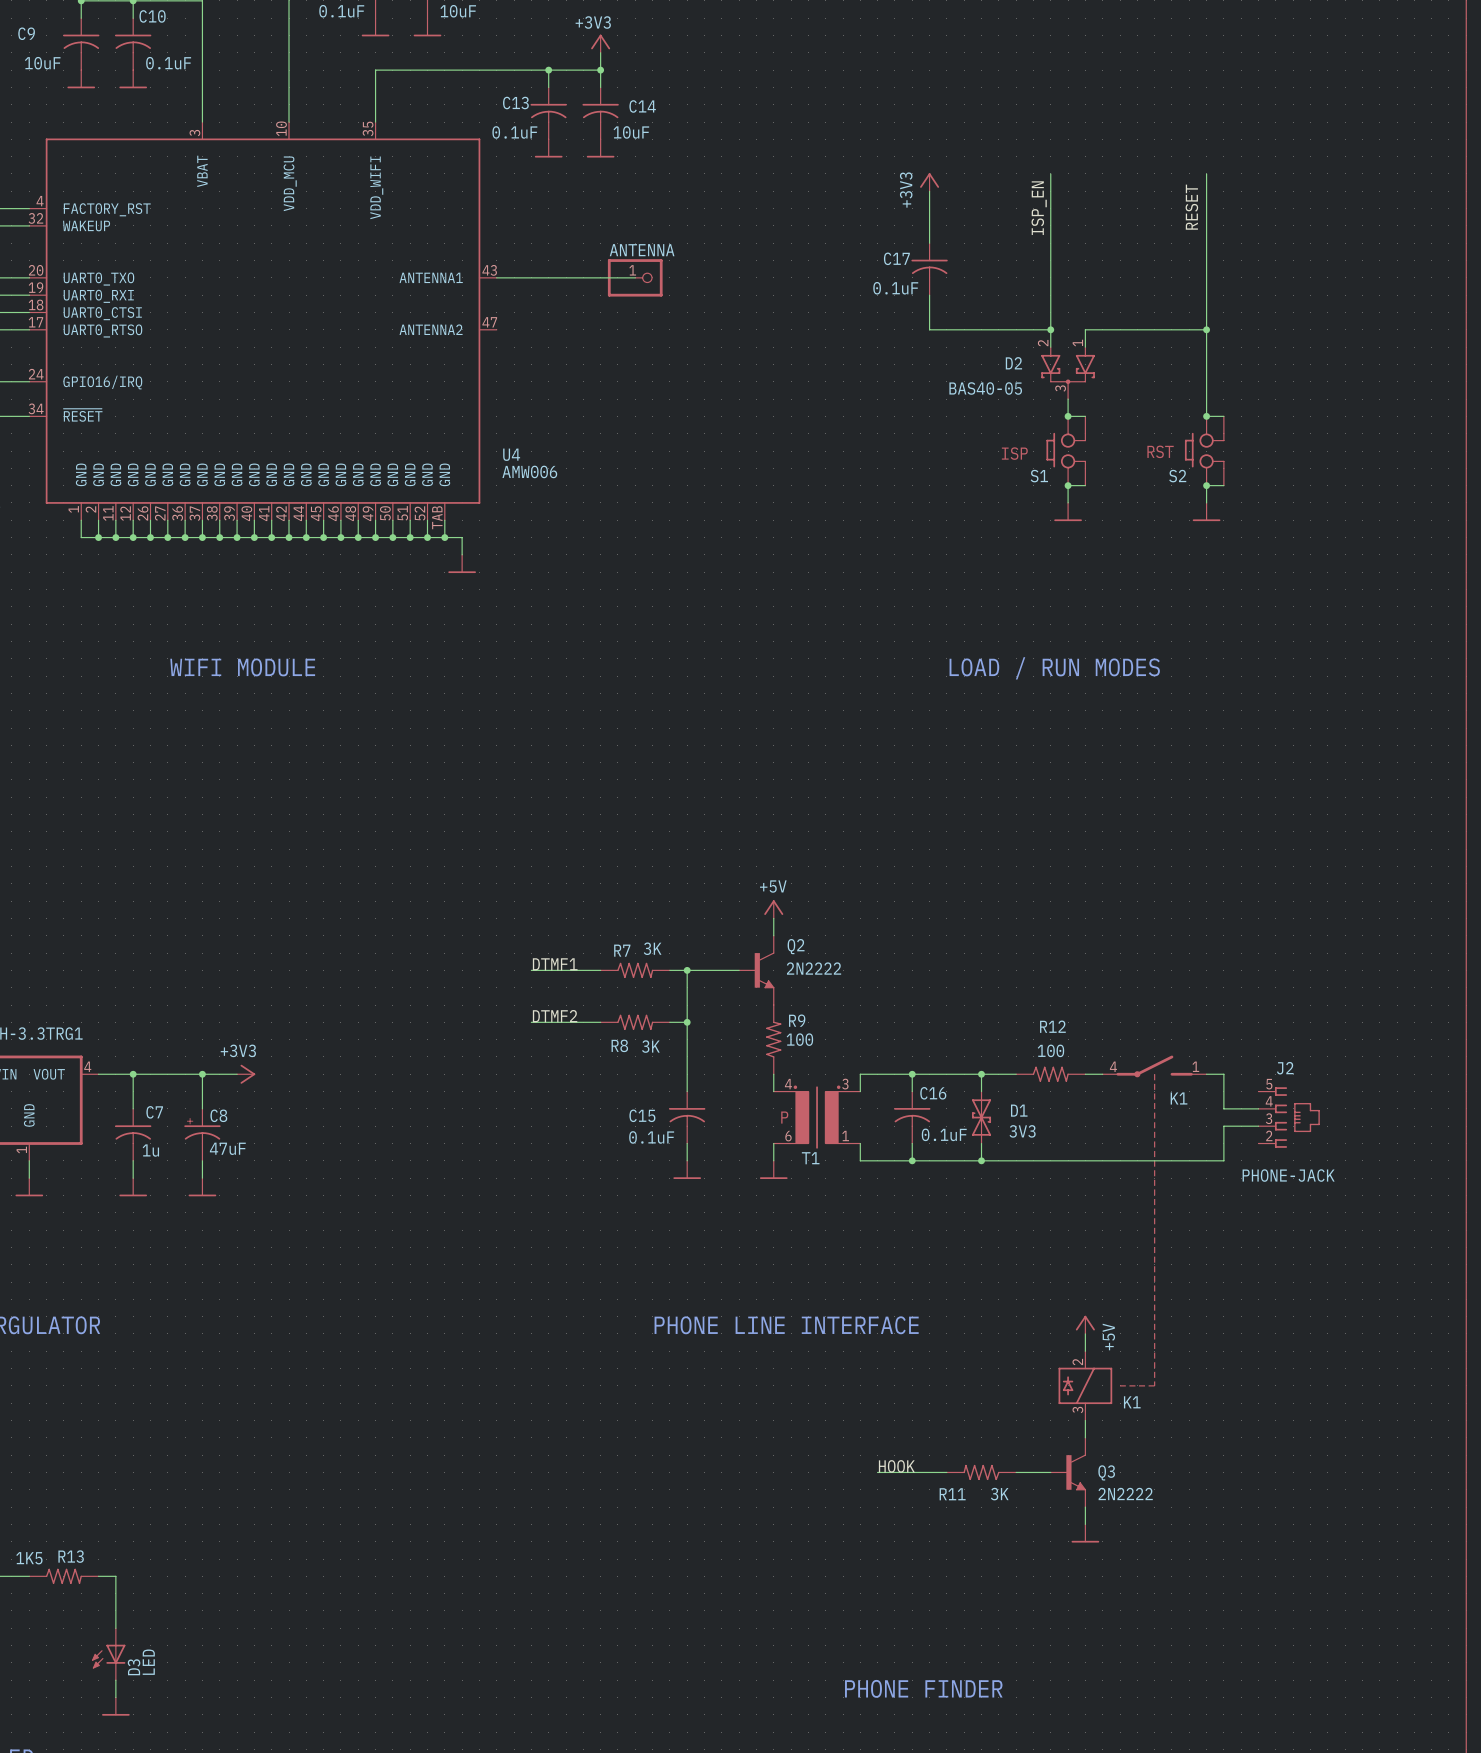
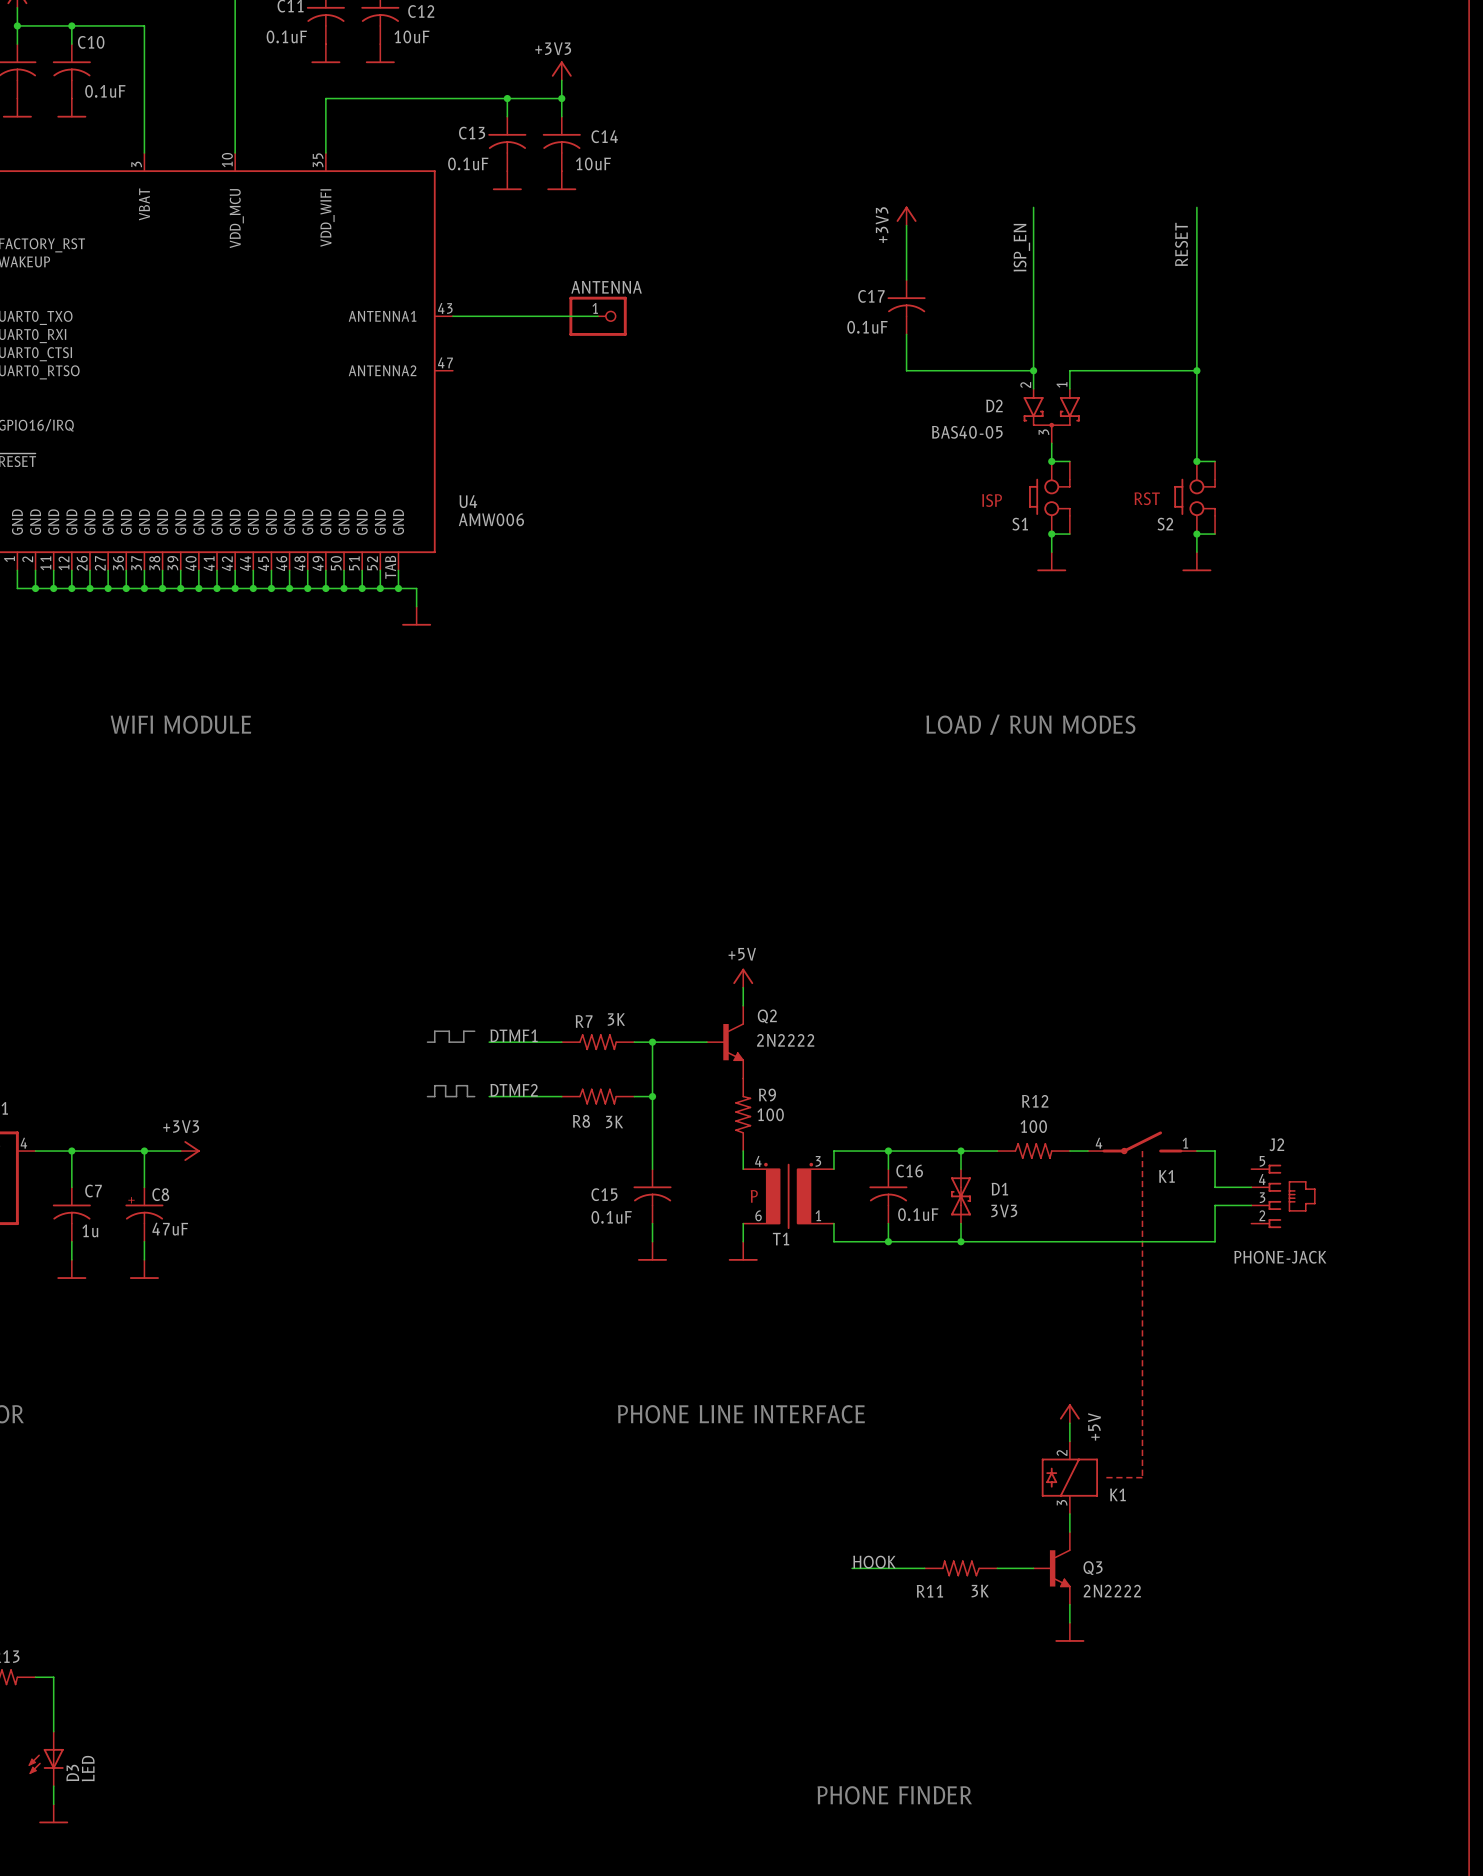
line: none -> (474, 1031) (463, 1031) (463, 1042) (449, 1042) (449, 1031) (434, 1031) (434, 1042) (427, 1042)
line: none -> (427, 1096) (434, 1096) (434, 1085) (445, 1085) (445, 1096) (456, 1096) (456, 1085) (467, 1085) (467, 1096) (474, 1096)

